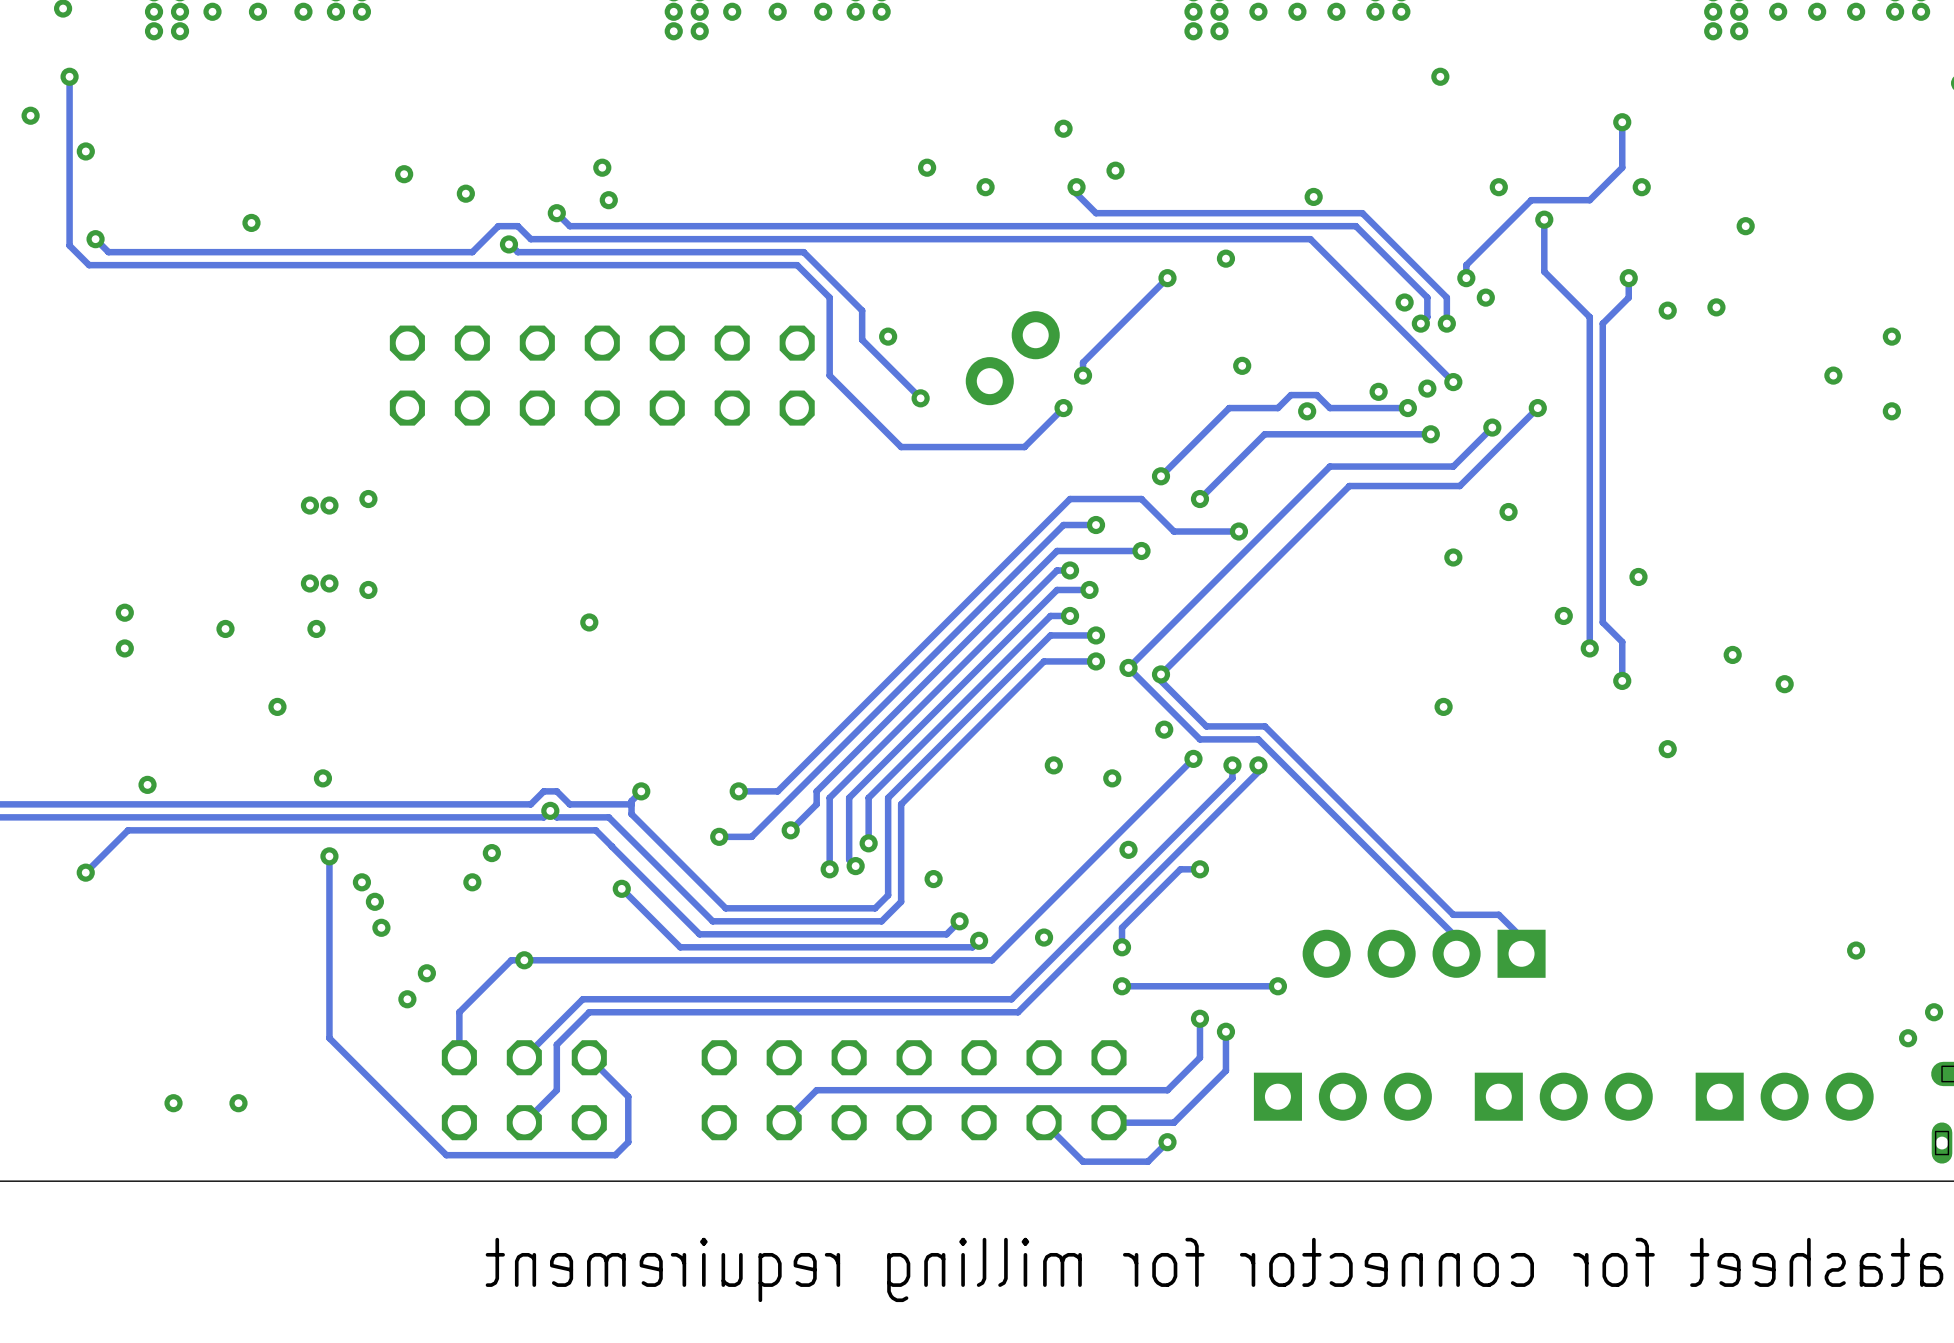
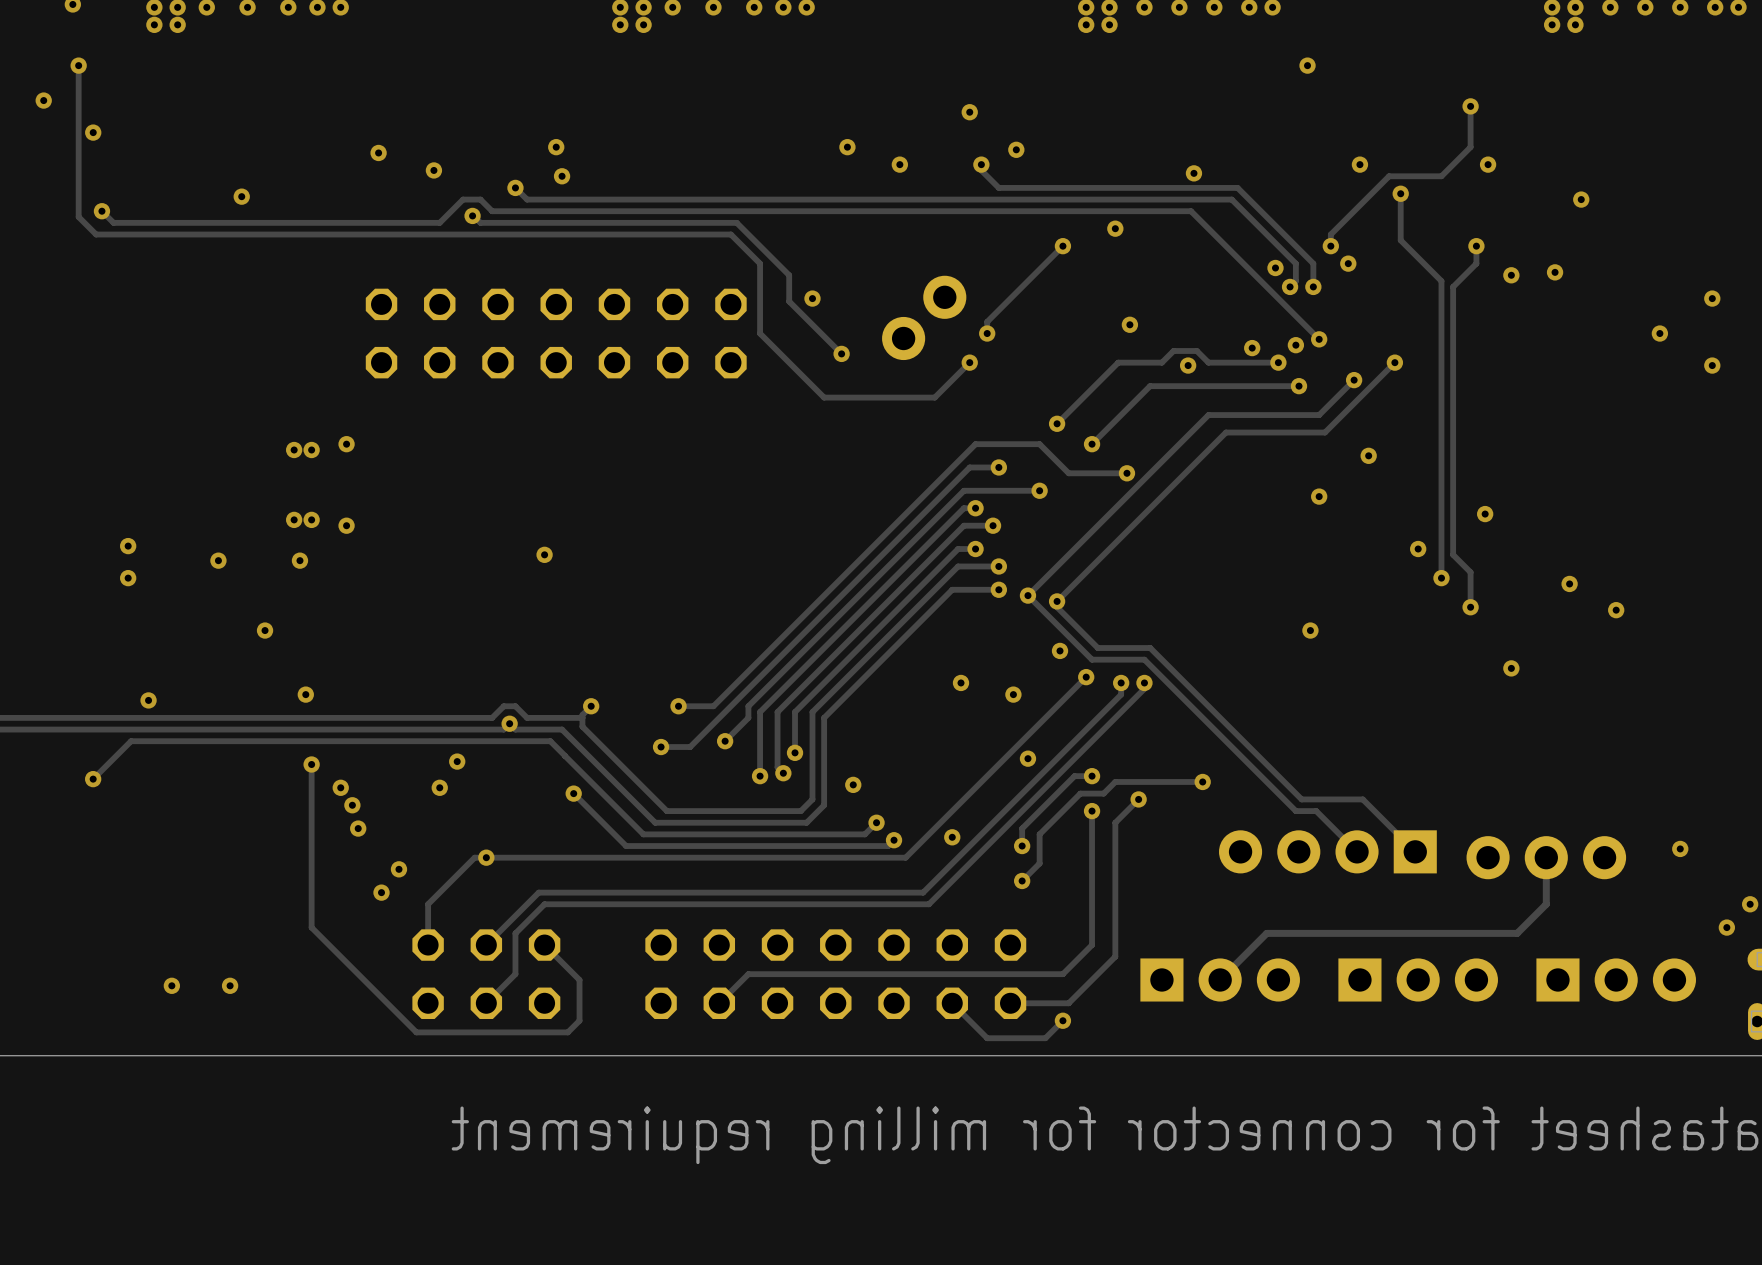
via: none -> (1202, 781)
track: none -> (1138, 799) (1115, 822) (1115, 921)
via: none -> (1138, 799)
track: (1433, 895) (1453, 914) (1498, 914) (1521, 937) (1521, 953) -> (1301, 799) (1362, 799) (1415, 851)
track: none -> (1092, 811) (1092, 910)
via: none -> (1092, 811)
track: (1427, 908) (1456, 937) (1456, 953) -> (1295, 811) (1316, 811) (1357, 851)
part position: (1424, 953) -> (1327, 851)
track: none -> (1546, 857) (1546, 904) (1517, 933) (1266, 933) (1220, 979)
part: none -> (1546, 857)
track: (1277, 986) (1122, 986) -> (1202, 781) (1115, 781) (1103, 793) (1080, 793) (1039, 834) (1039, 863) (1022, 880)
via: (1277, 986) -> none
via: (1199, 1018) -> none
via: (1225, 1031) -> none

